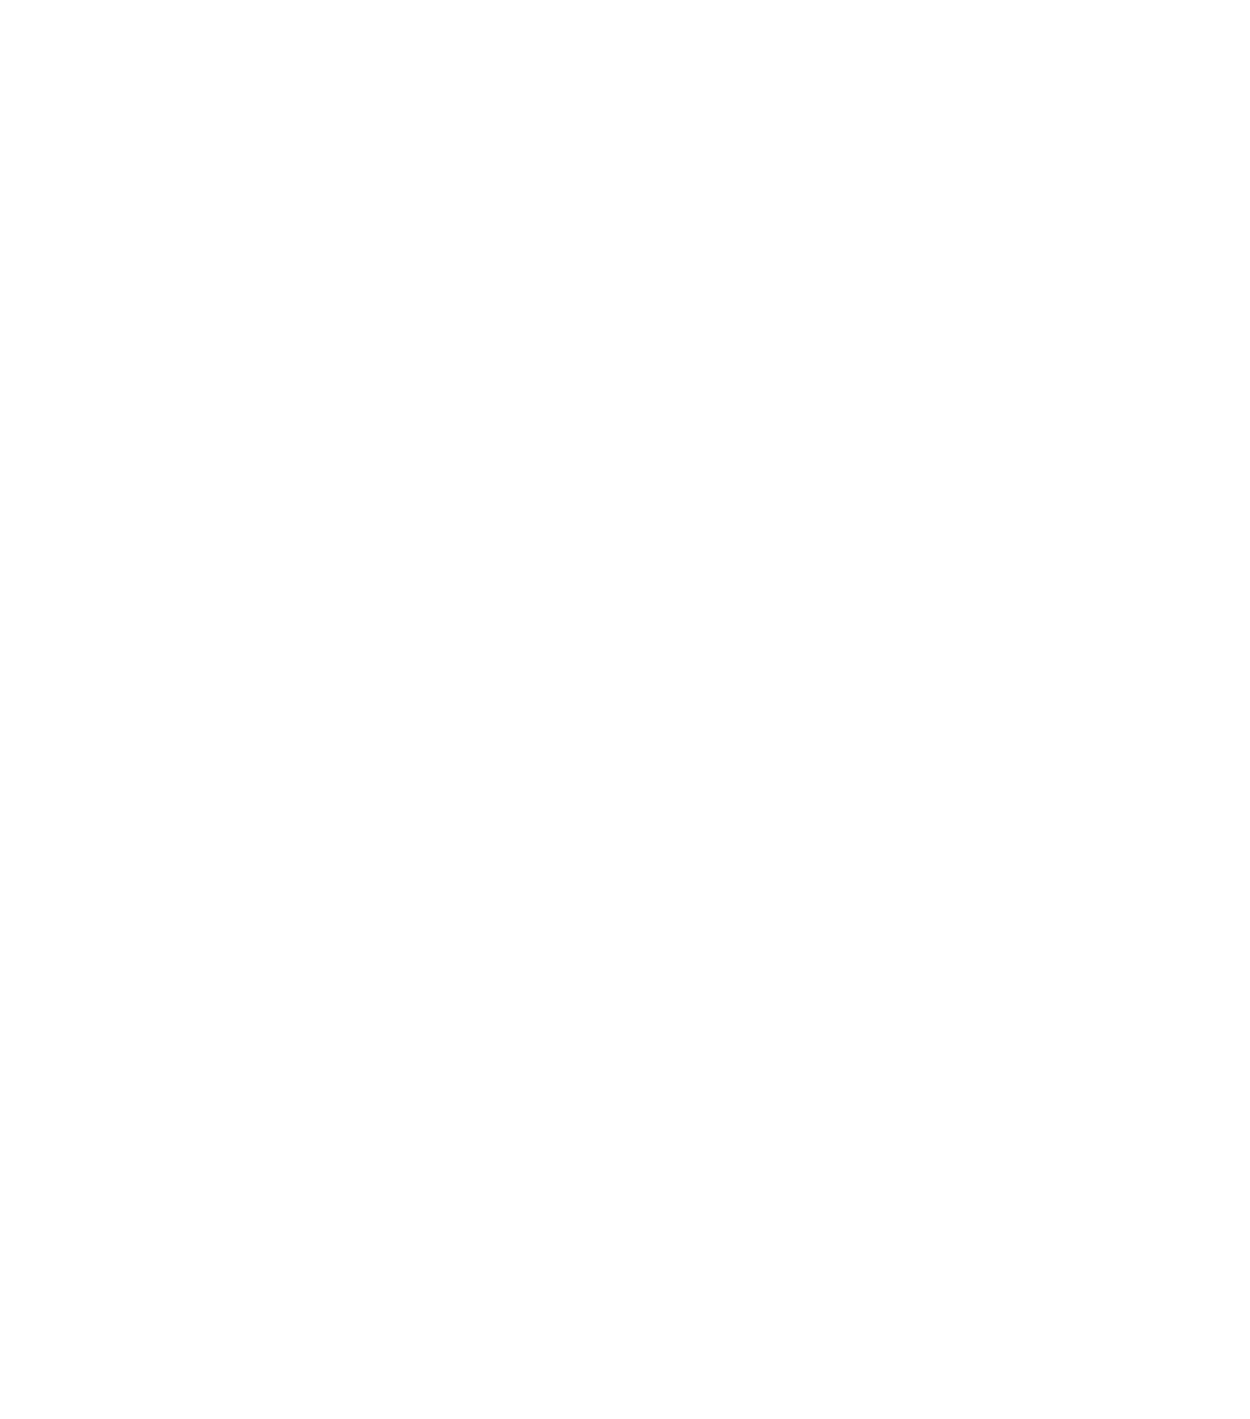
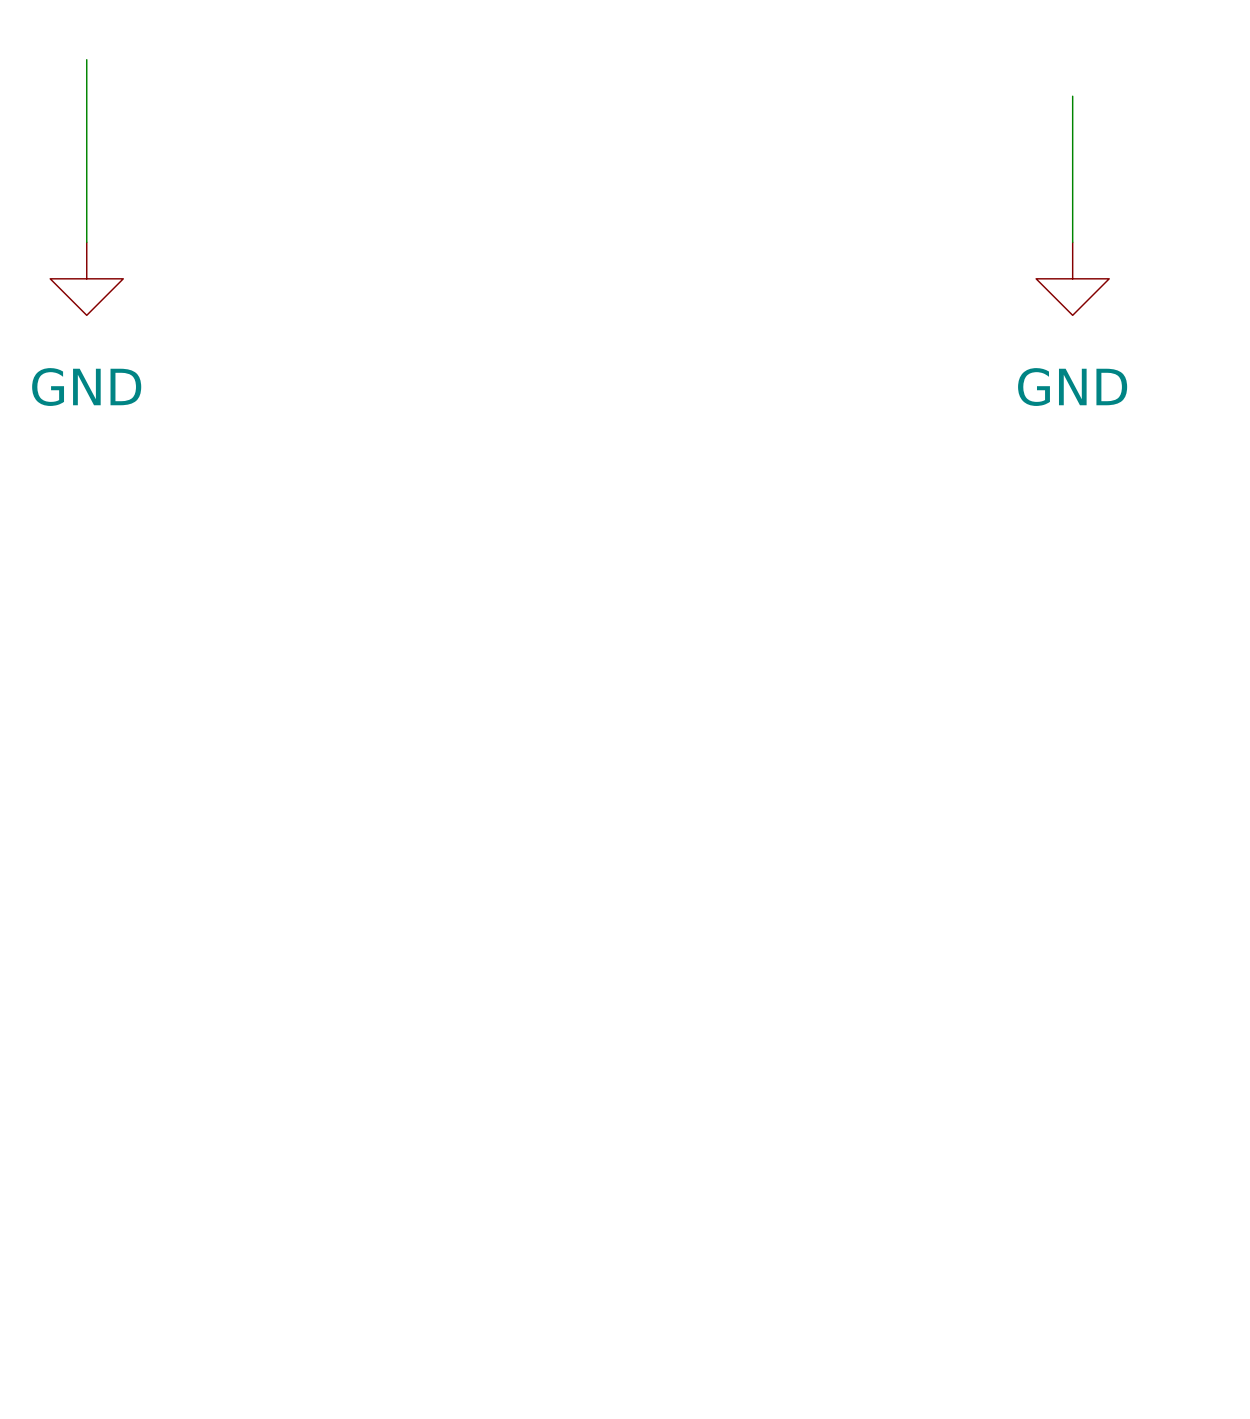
wire: none -> (86, 59) (86, 242)
wire: none -> (1072, 96) (1072, 242)
power symbol: none -> GND (86, 278)
power symbol: none -> GND (1072, 278)

